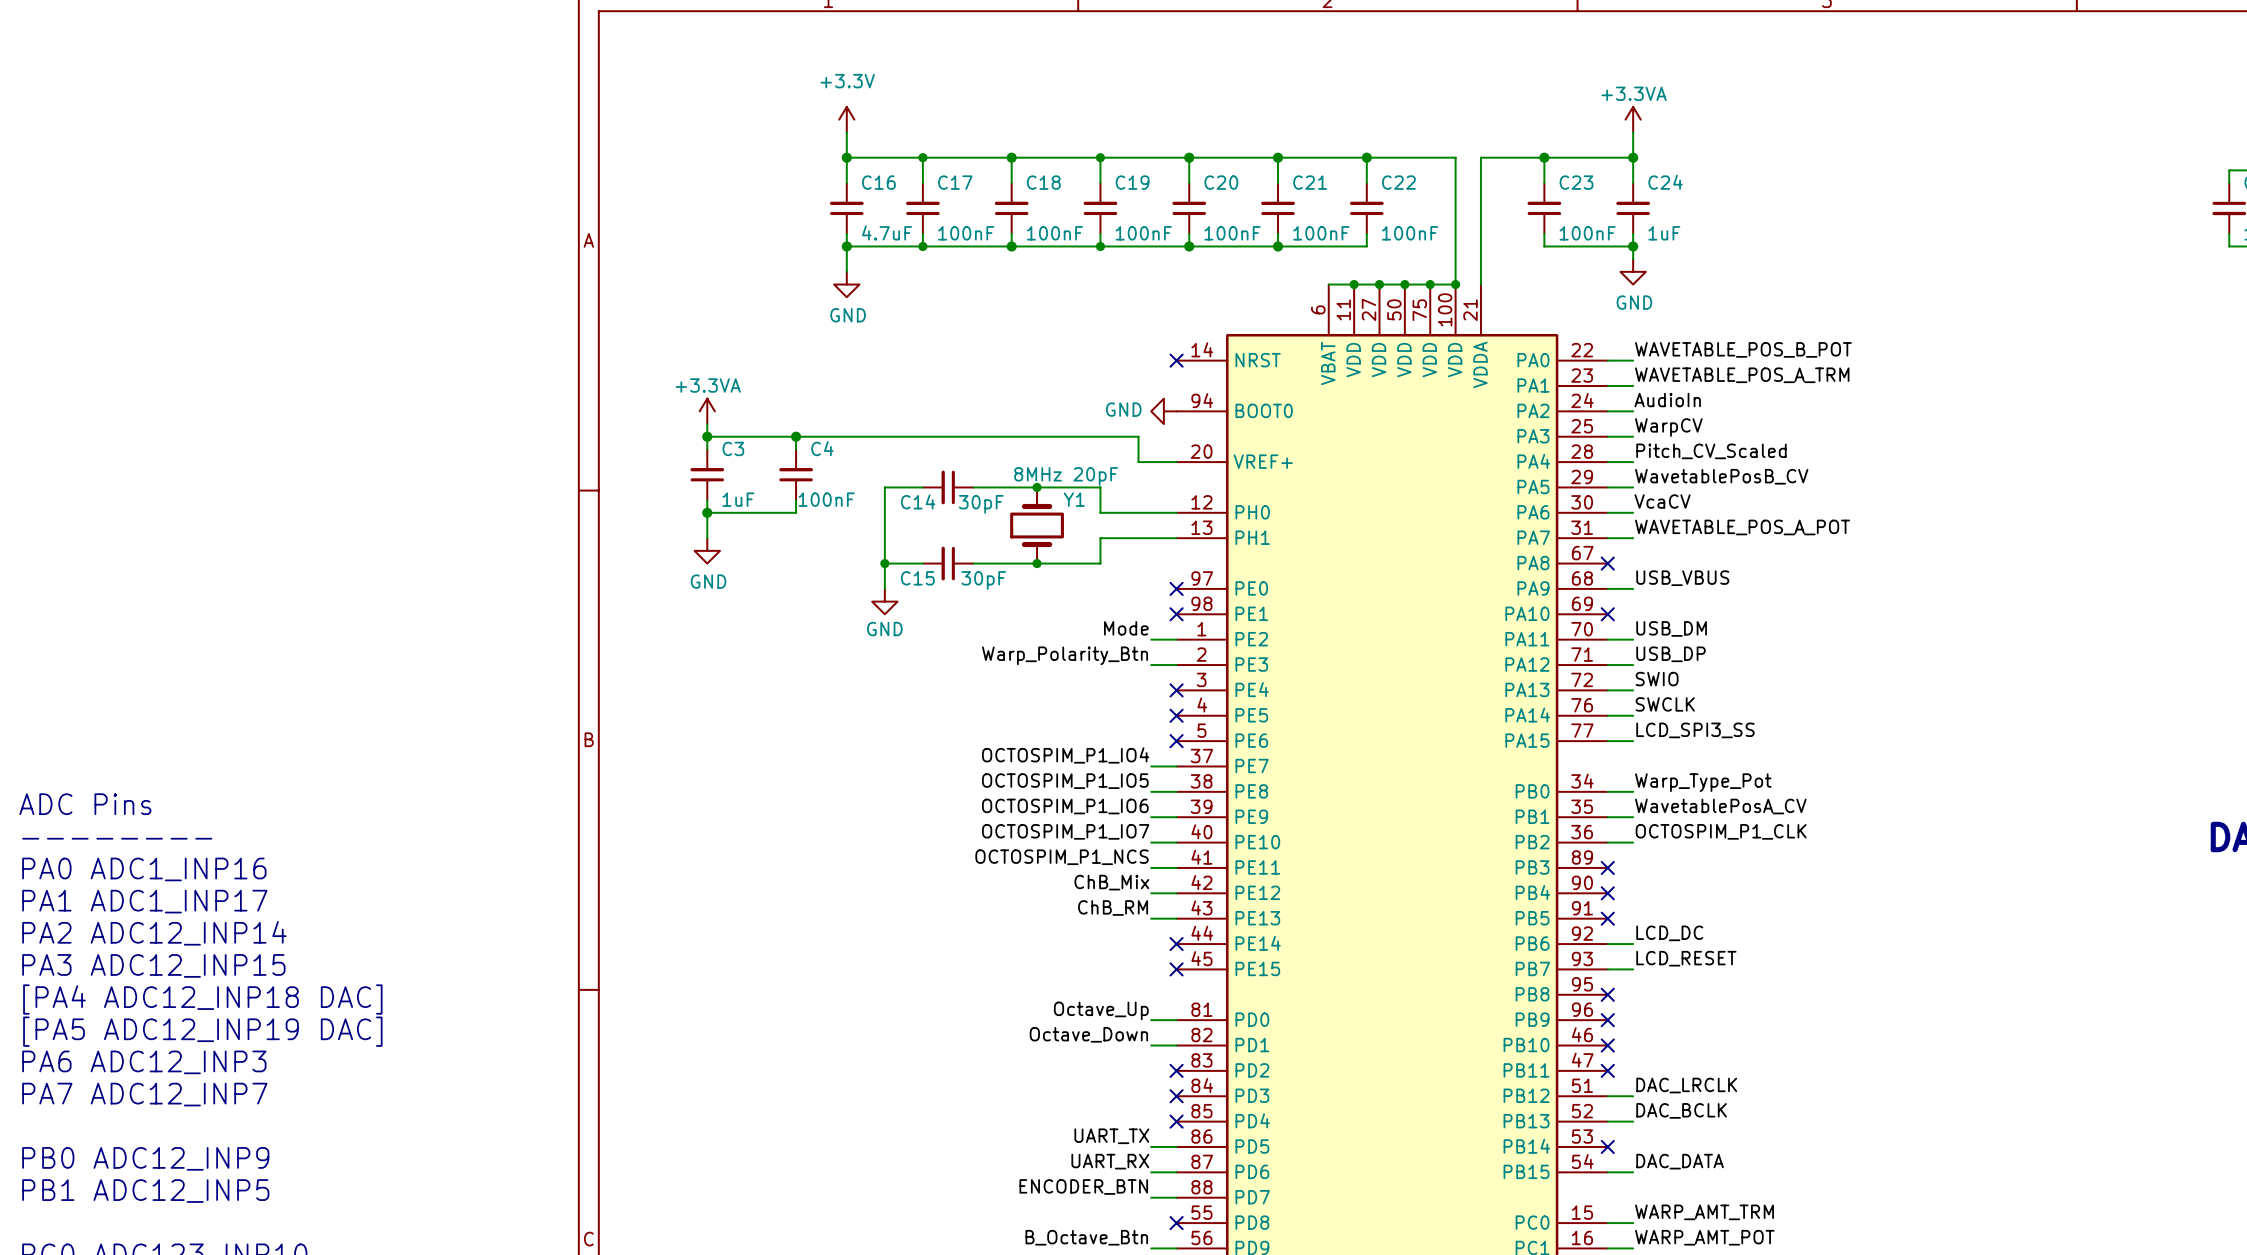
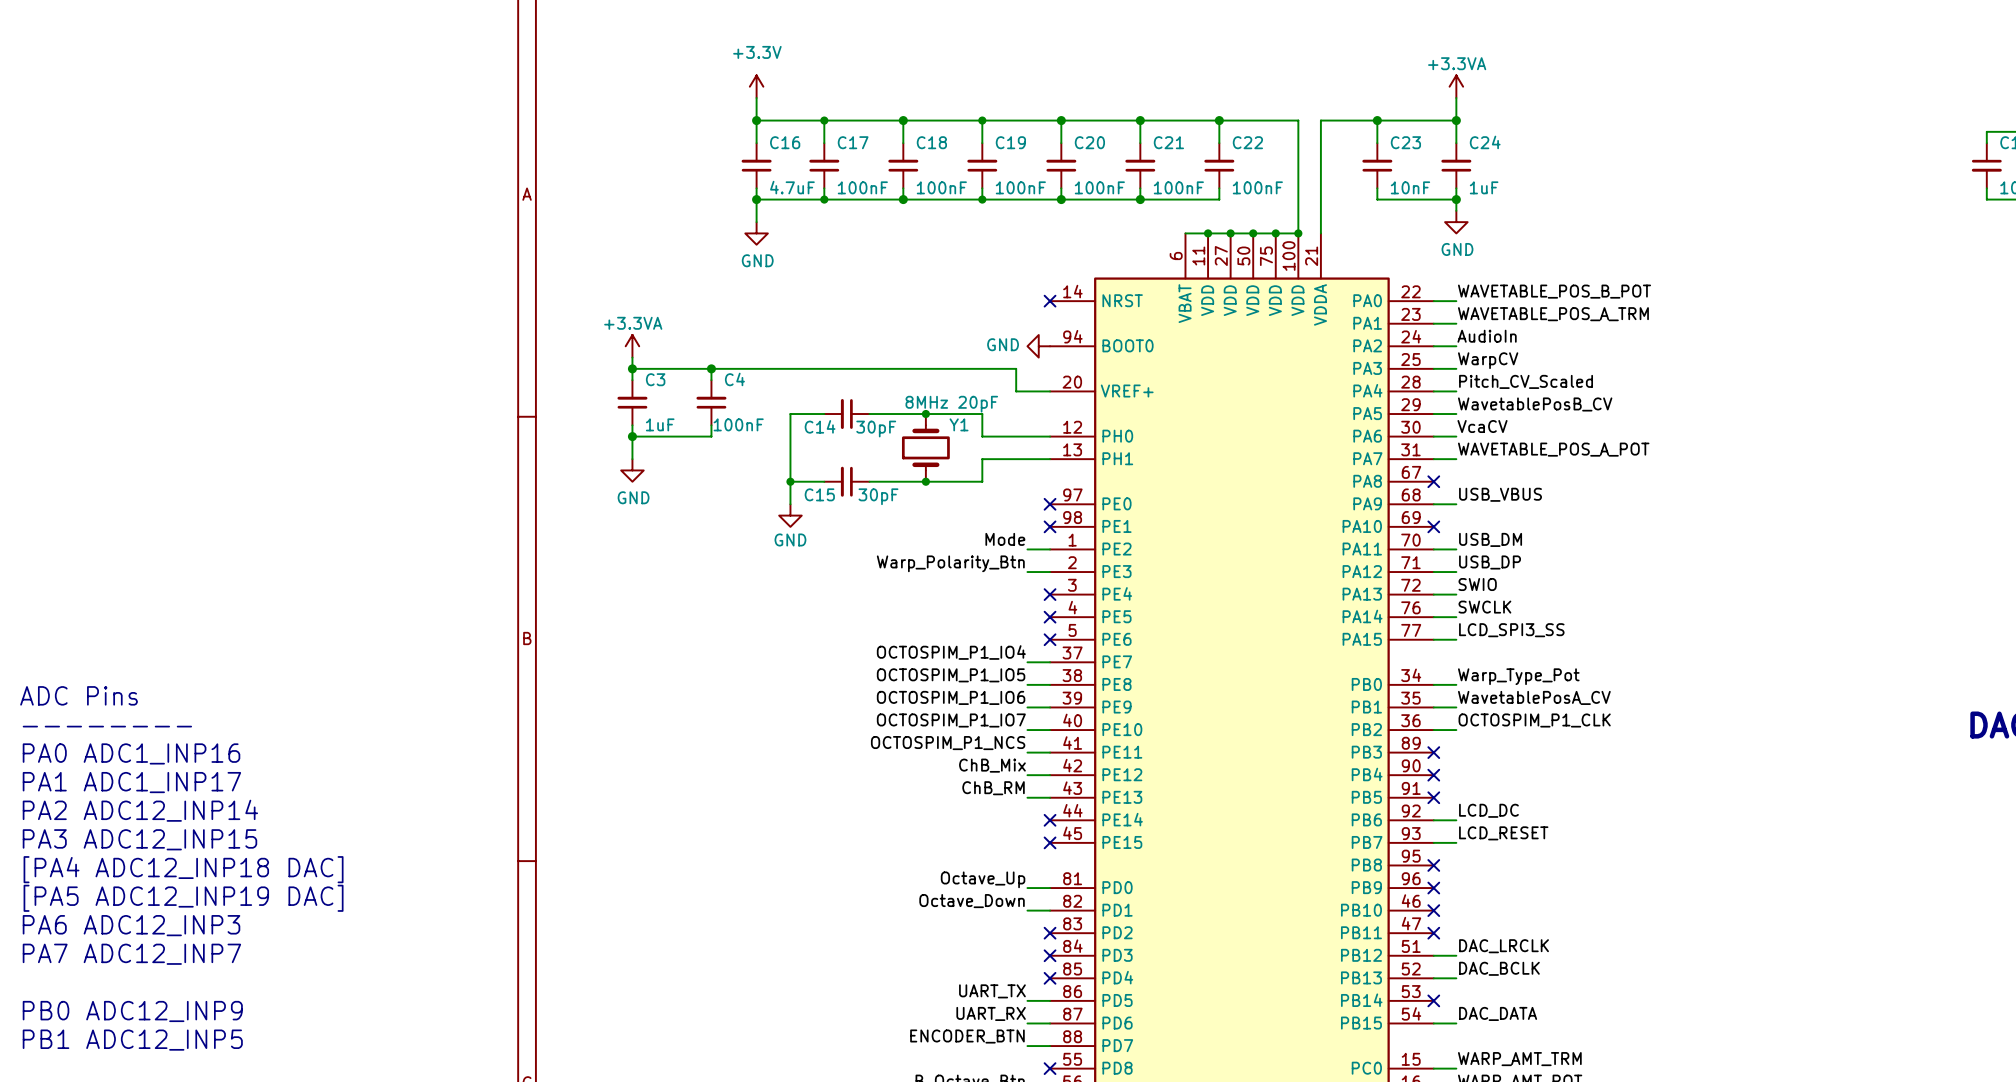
C23 value: 100nF (1587, 233) -> 10nF (1410, 187)

